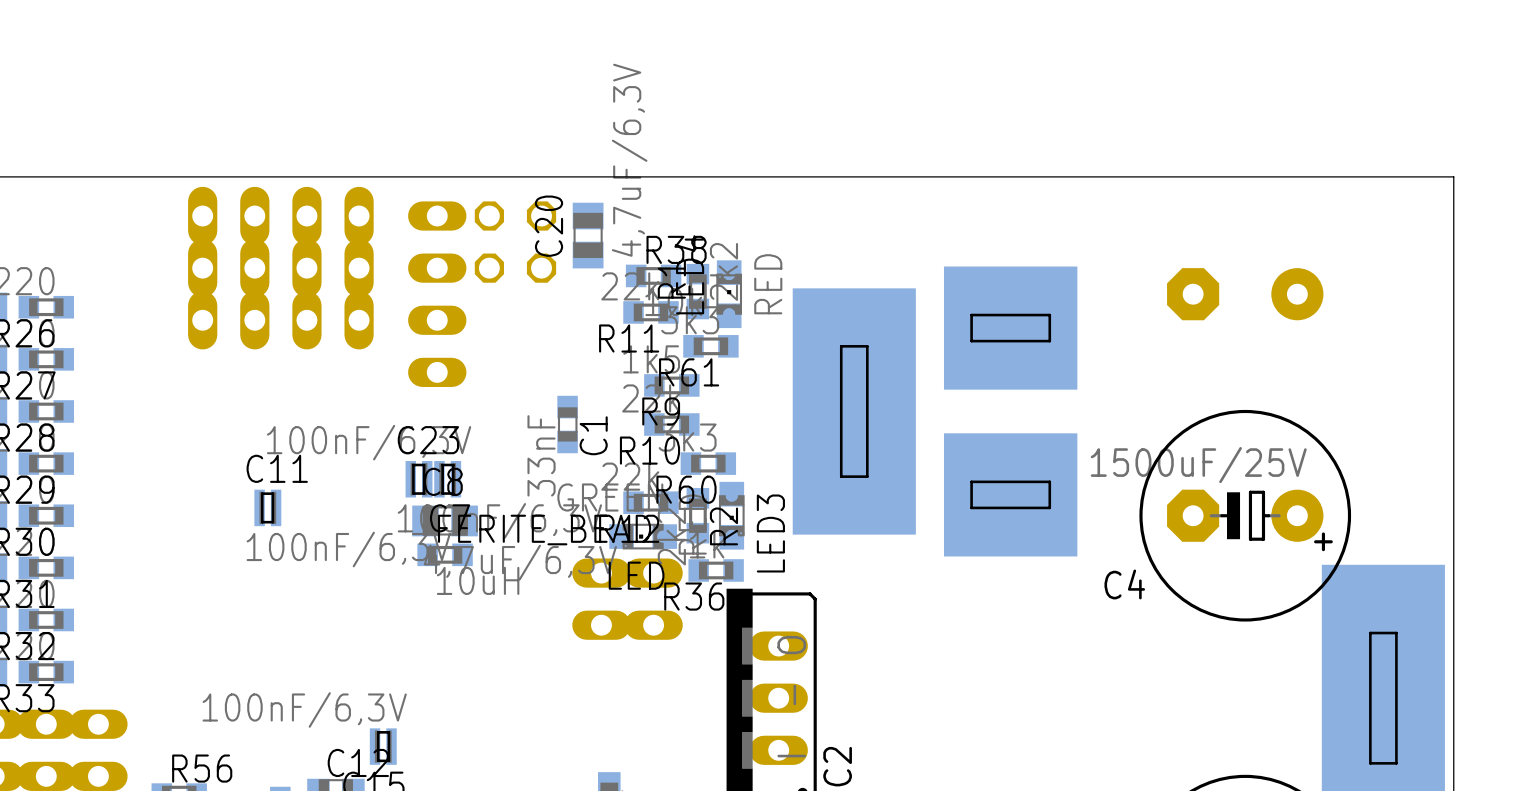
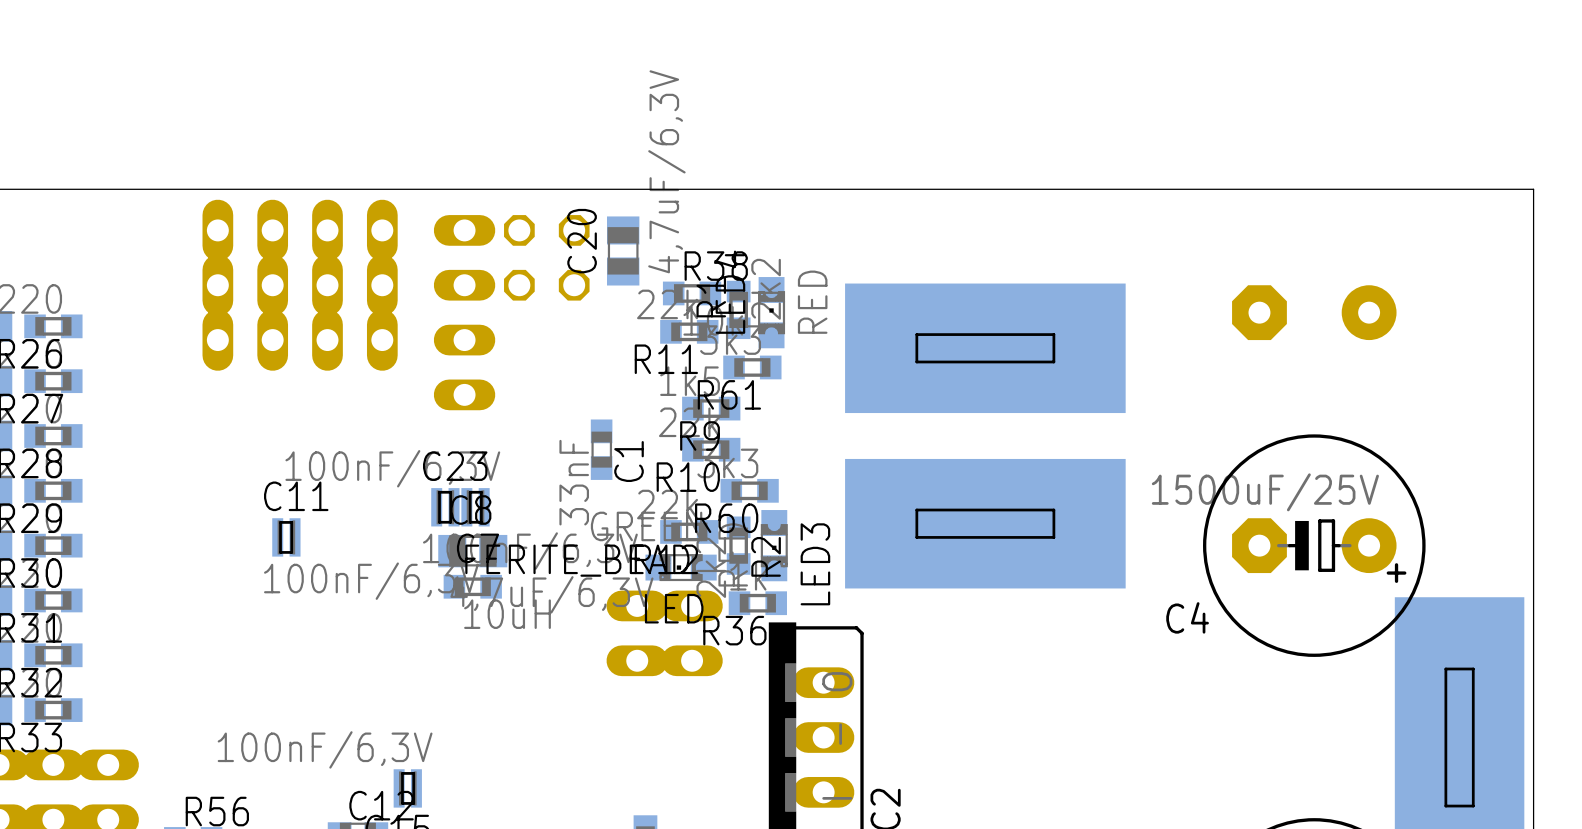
part: none -> (985, 348)
part: (1010, 328) -> none
part: (854, 411) -> none
part: none -> (985, 523)
part: (1010, 494) -> none

